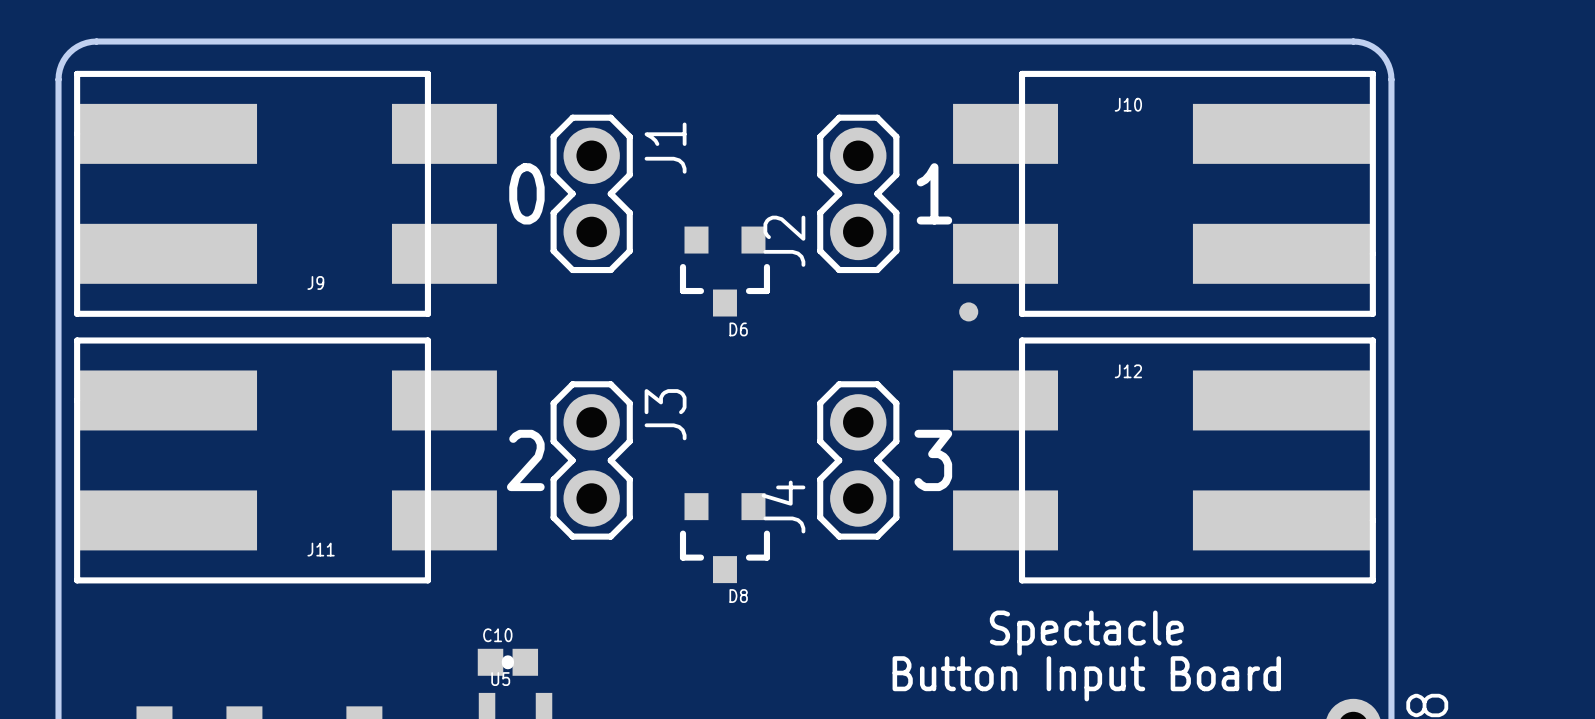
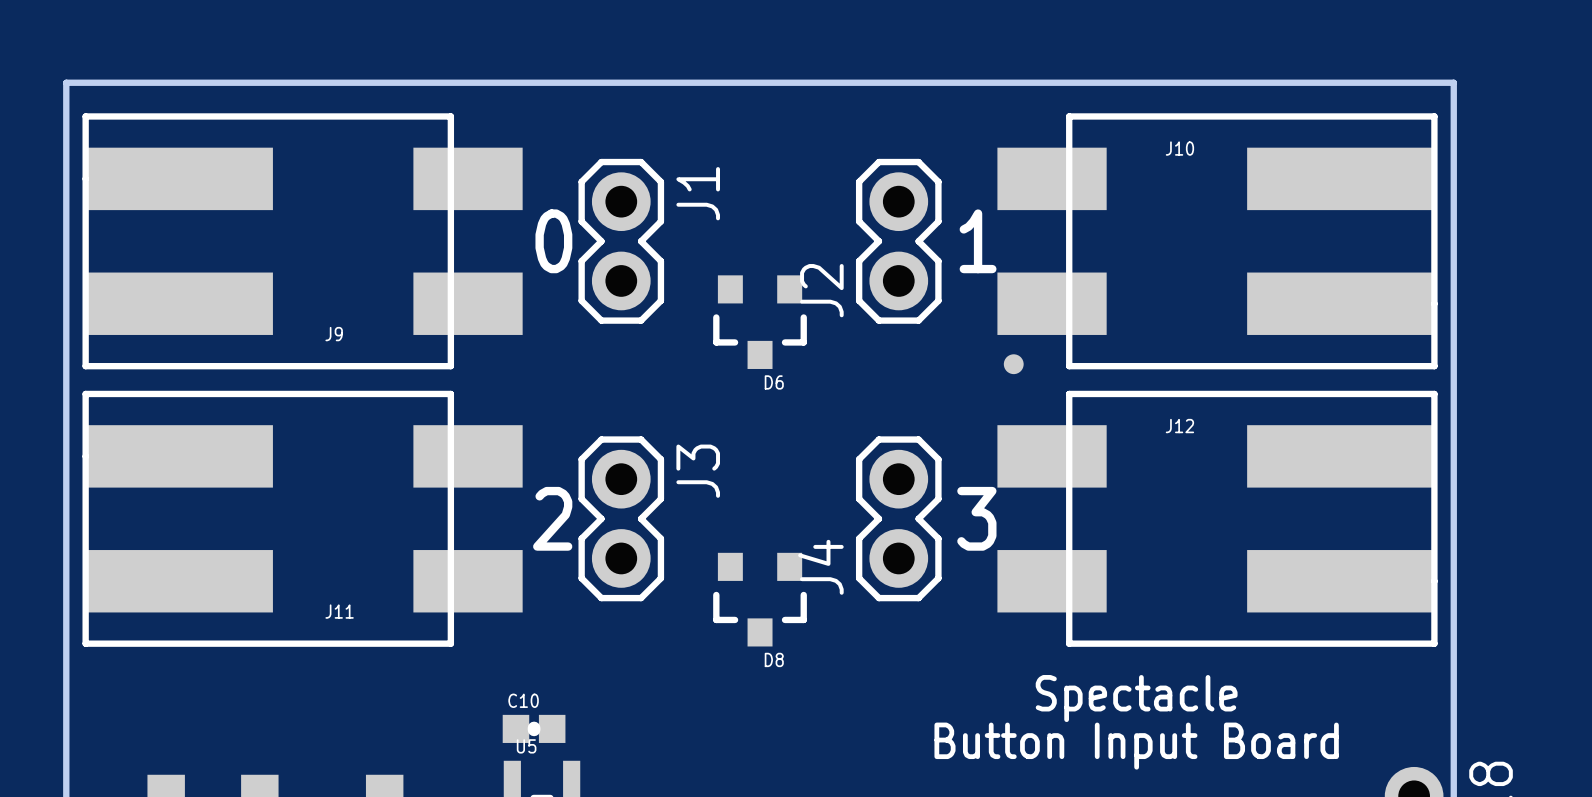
board edge: (96, 41) (82, 44) (69, 52) (61, 65) (58, 79) -> (105, 82) (66, 82) (66, 122)
board edge: (1353, 41) (1367, 44) (1380, 52) (1388, 65) (1391, 79) -> (1414, 82) (1453, 82) (1453, 122)

